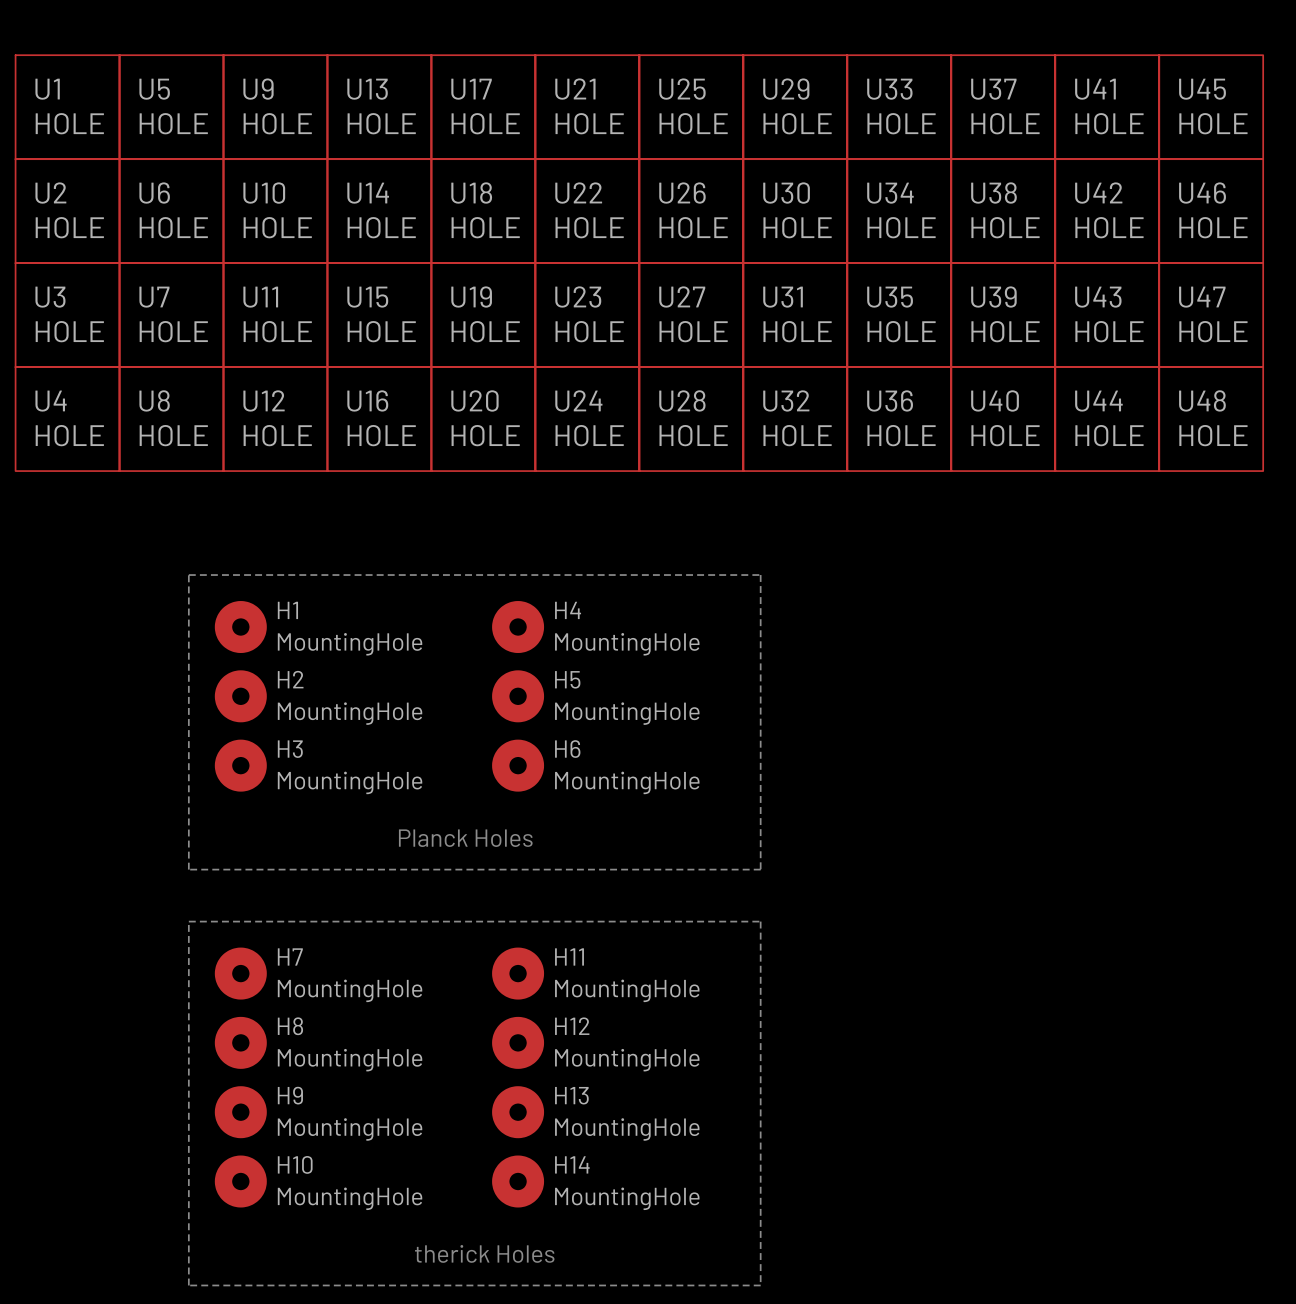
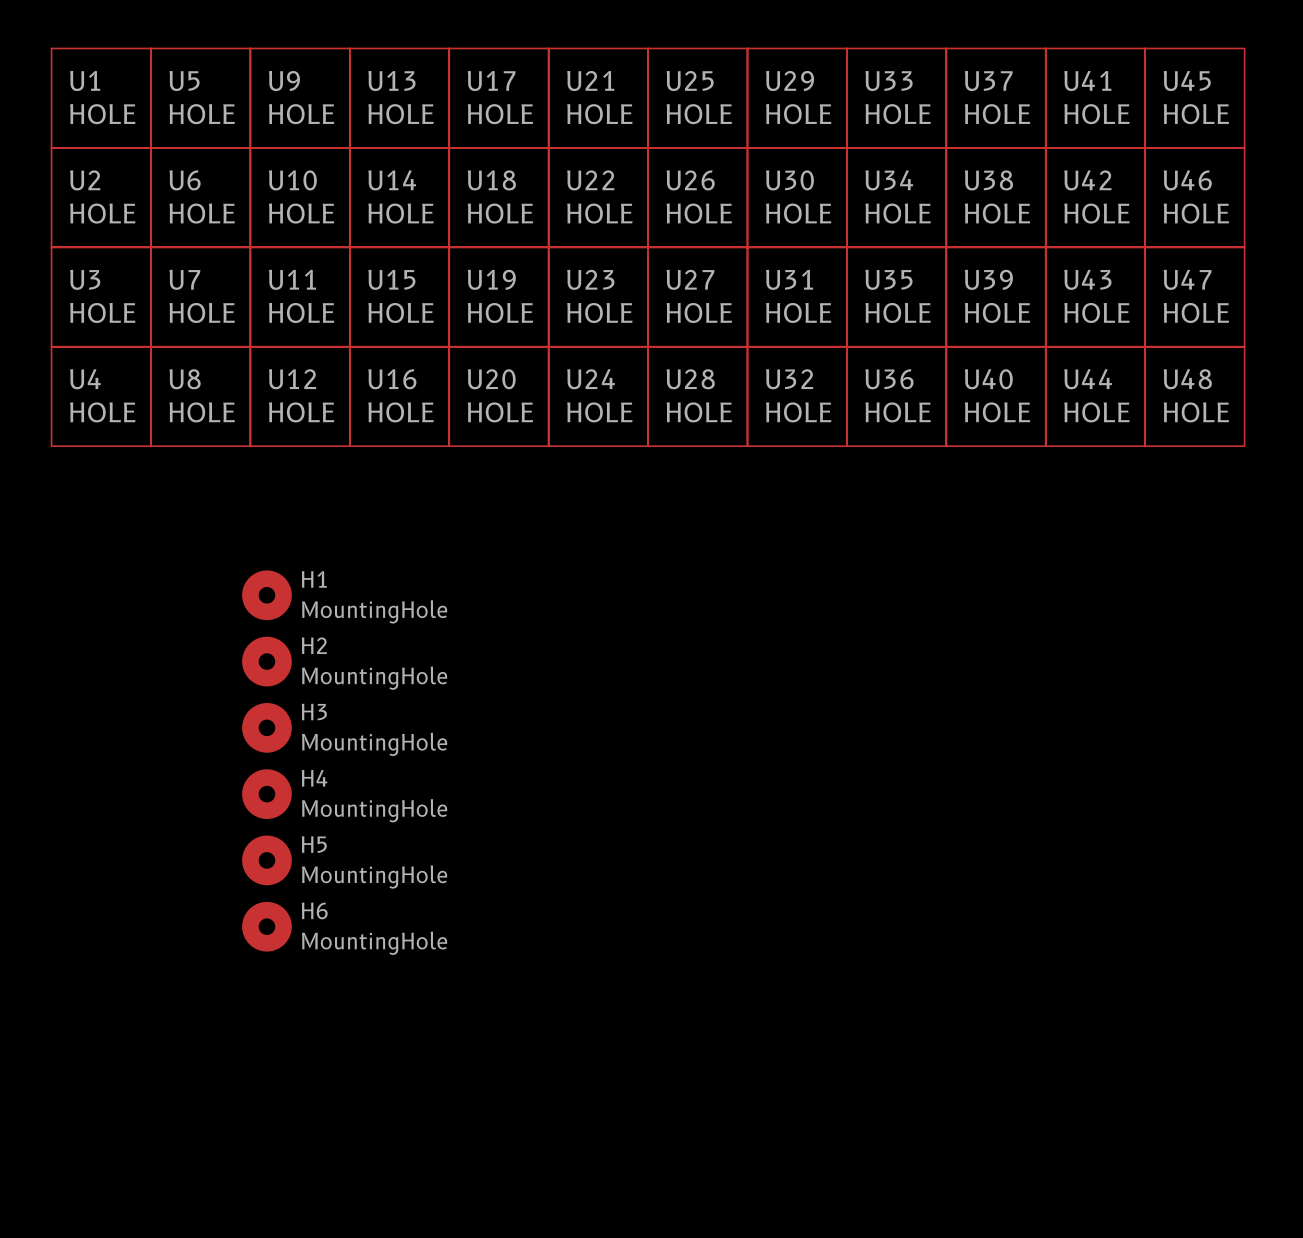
line: (188, 575) (760, 575) (760, 869) (188, 869) (188, 575) -> none
H4 position: (518, 627) -> (266, 794)
H5 position: (518, 696) -> (266, 860)
H6: MountingHole (518, 765) -> none
text: Planck Holes (465, 838) -> none
line: (188, 921) (188, 1285) (760, 1285) (760, 921) (188, 921) -> none
H7 name: H7 (290, 956) -> H6 (314, 910)
H11: MountingHole (518, 973) -> none
H8: MountingHole (240, 1042) -> none
H12: MountingHole (518, 1042) -> none
H9: MountingHole (240, 1112) -> none
H13: MountingHole (518, 1112) -> none
H10: MountingHole (240, 1181) -> none
H14: MountingHole (518, 1181) -> none
text: therick Holes (484, 1253) -> none

